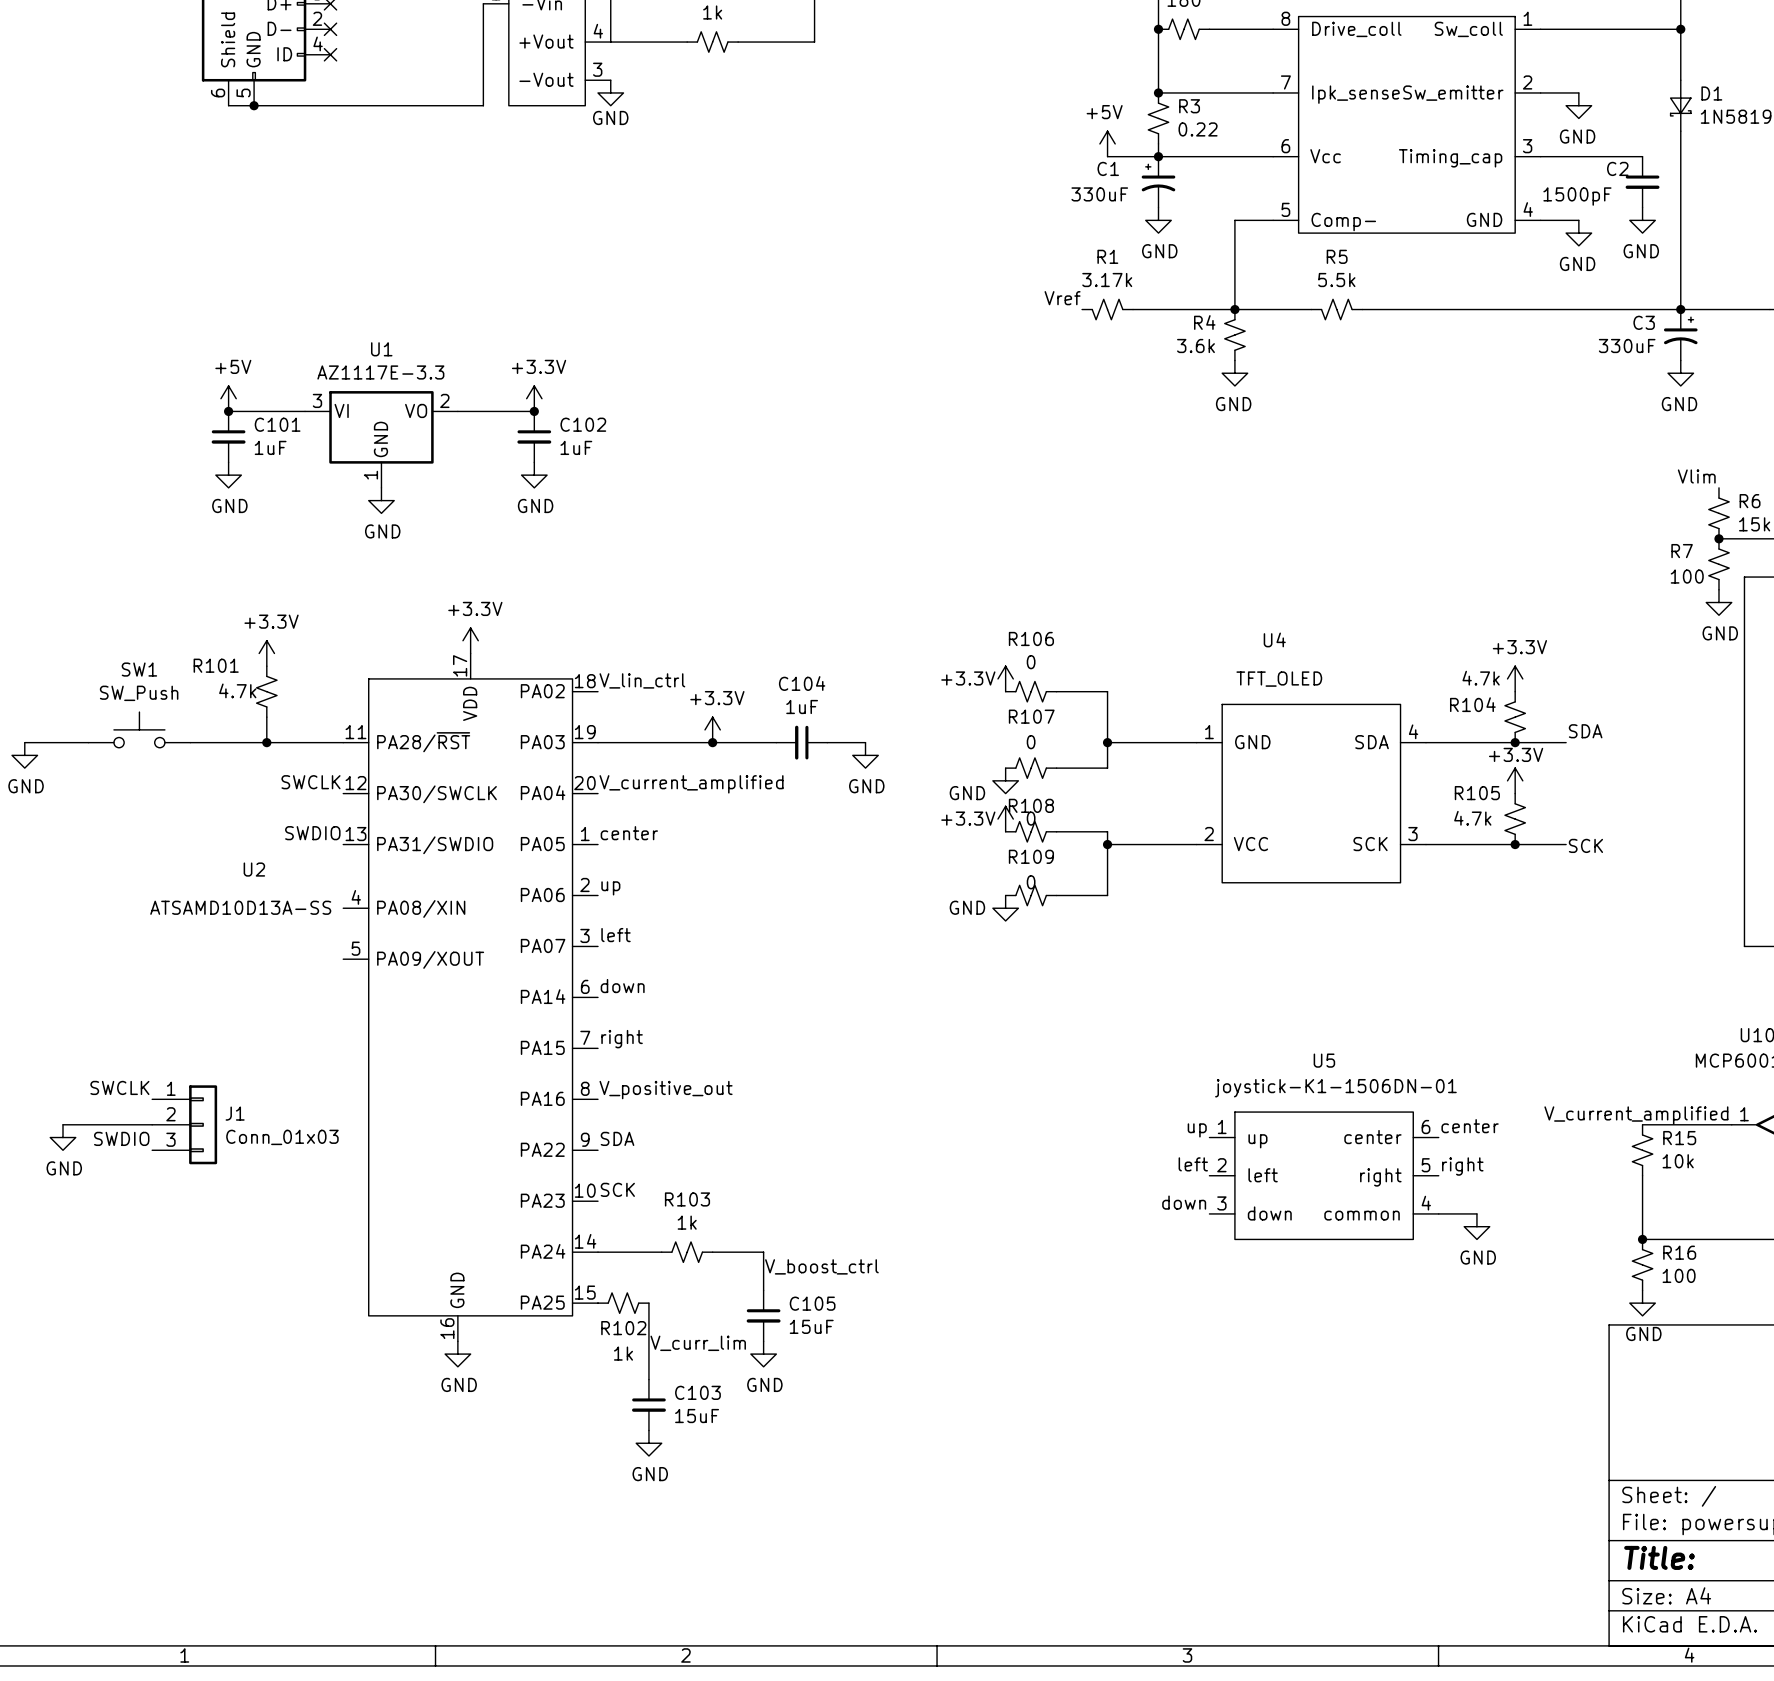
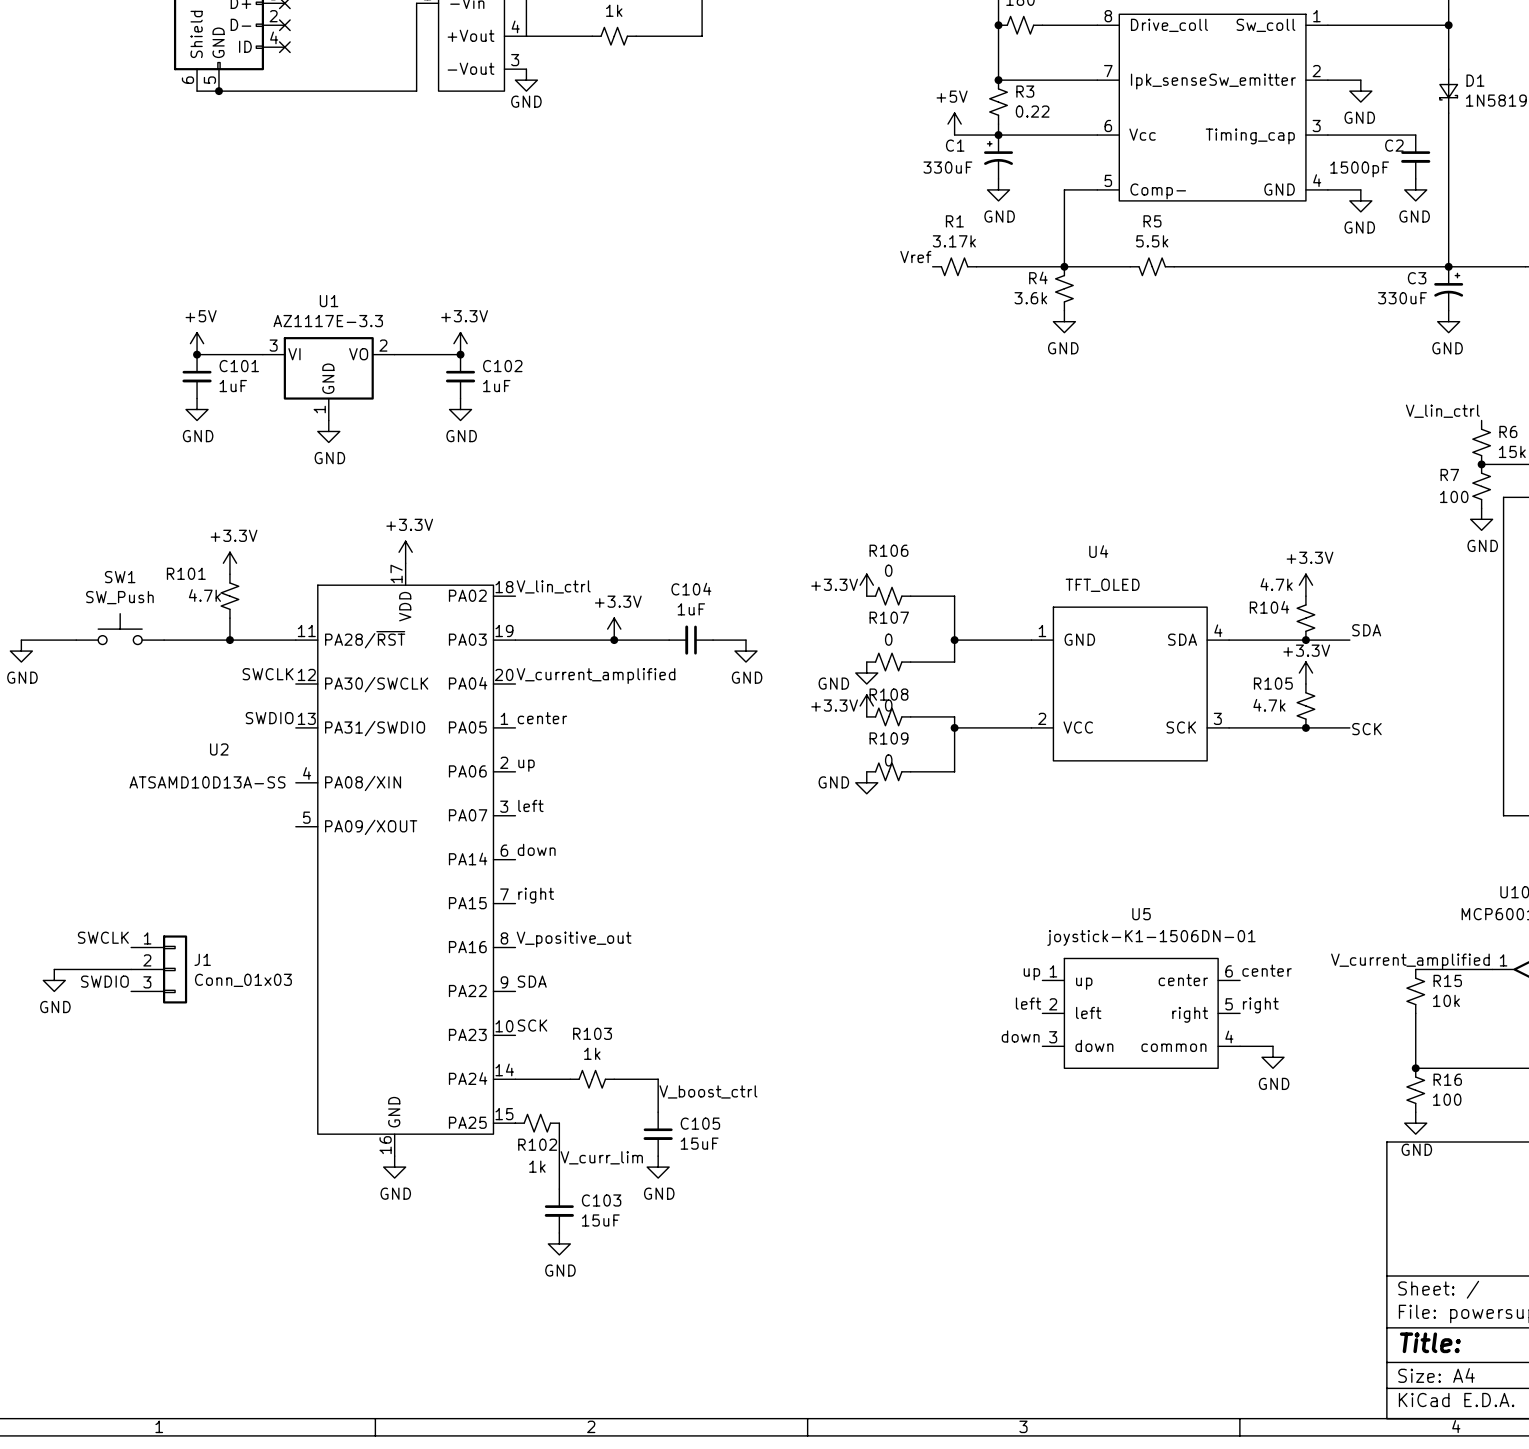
label: Vlim (1696, 476) -> V_lin_ctrl (1442, 411)

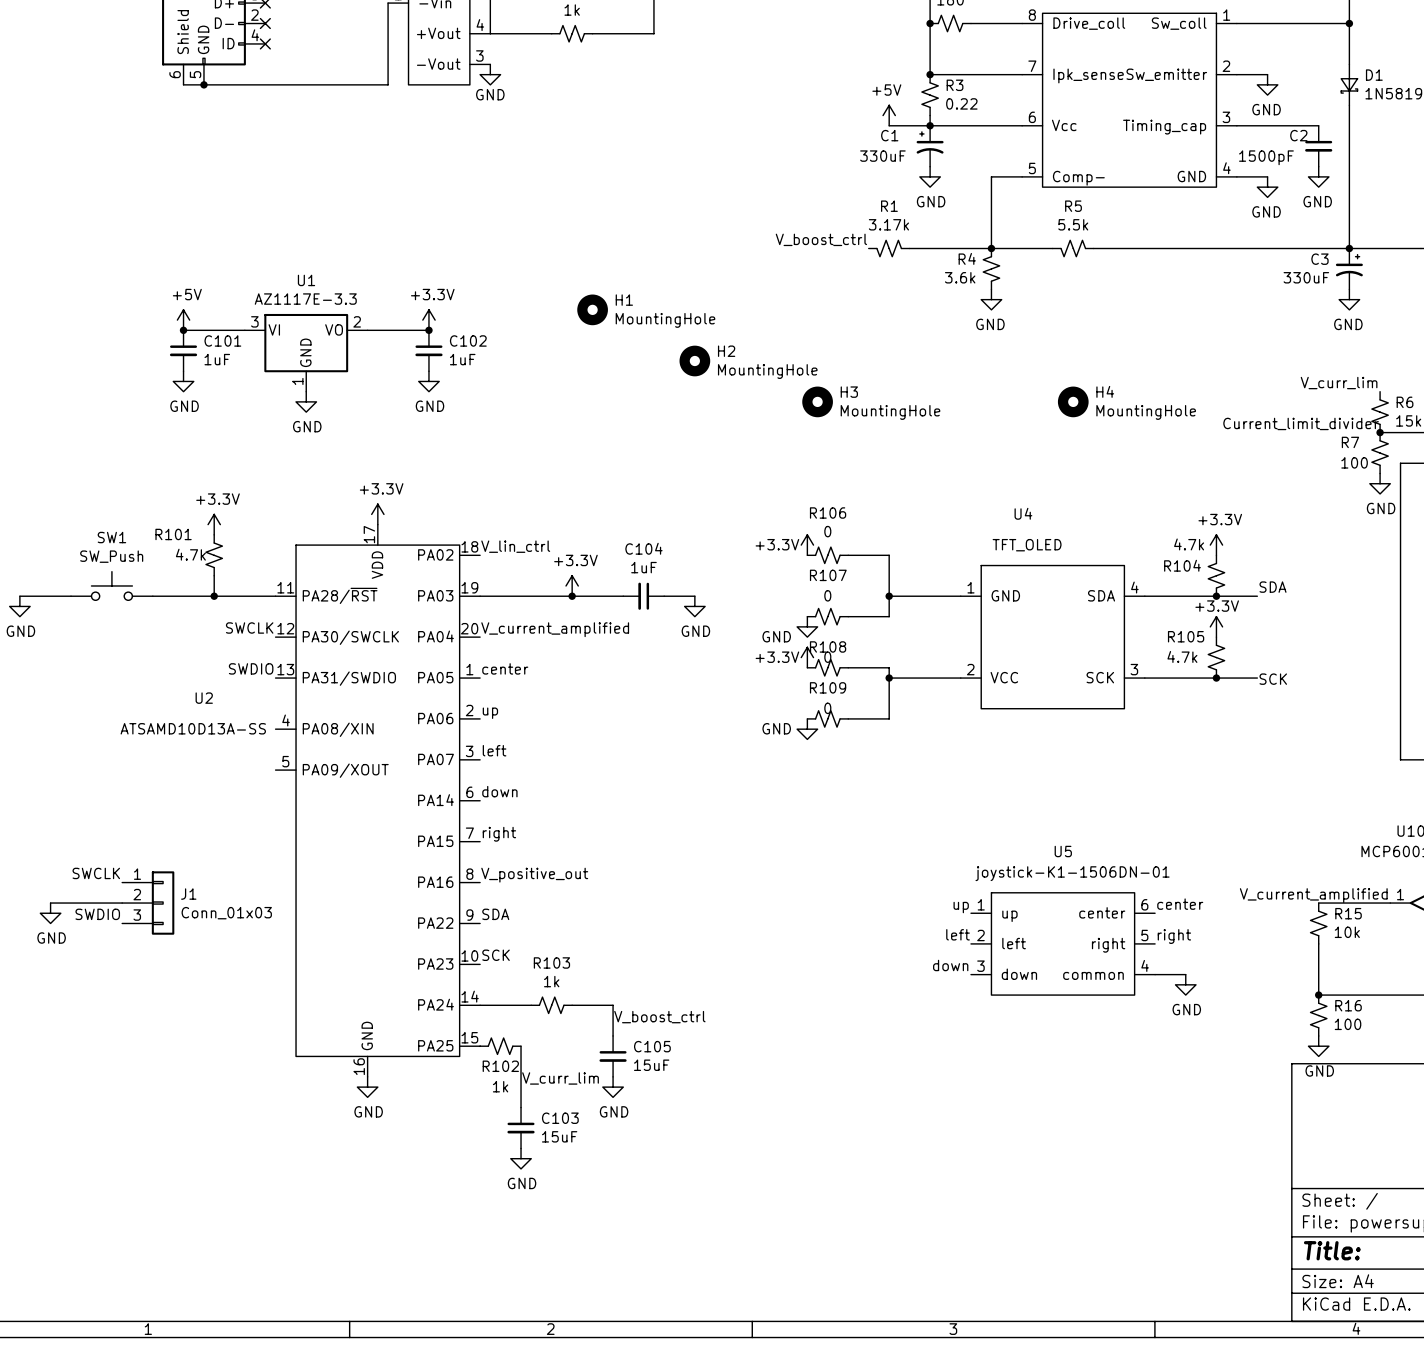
label: Vref (915, 256) -> V_boost_ctrl (821, 239)
H1: none -> MountingHole (592, 309)
H2: none -> MountingHole (694, 361)
label: V_lin_ctrl (1442, 411) -> V_curr_lim (1339, 383)
H3: none -> MountingHole (817, 401)
H4: none -> MountingHole (1073, 401)
label: none -> Current_limit_divider (1301, 423)

